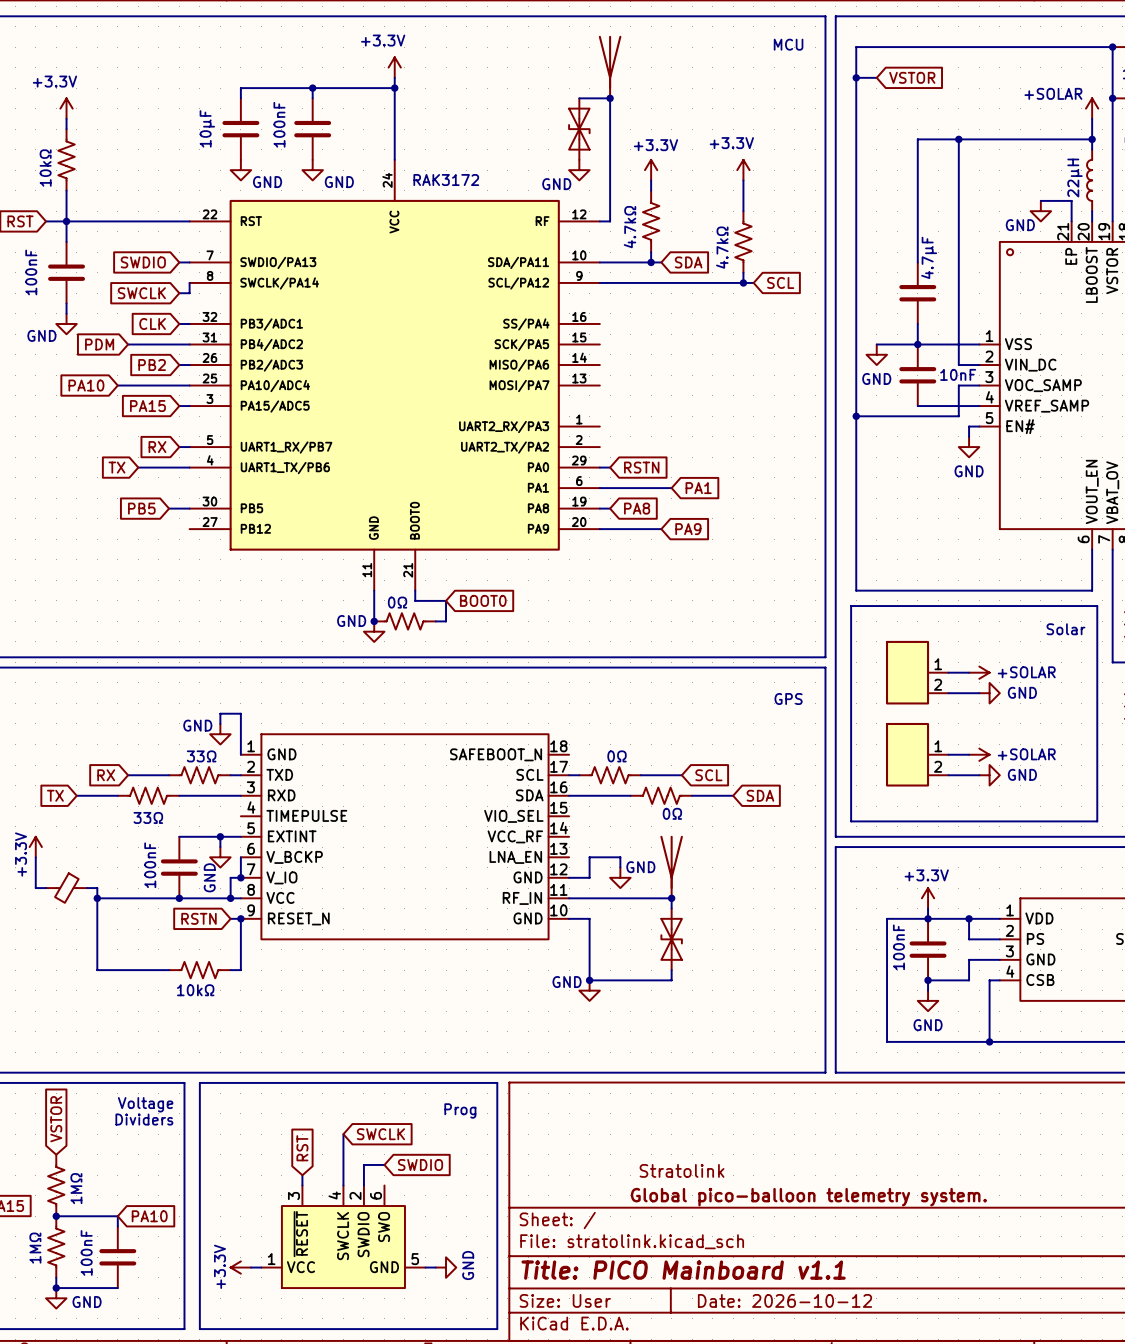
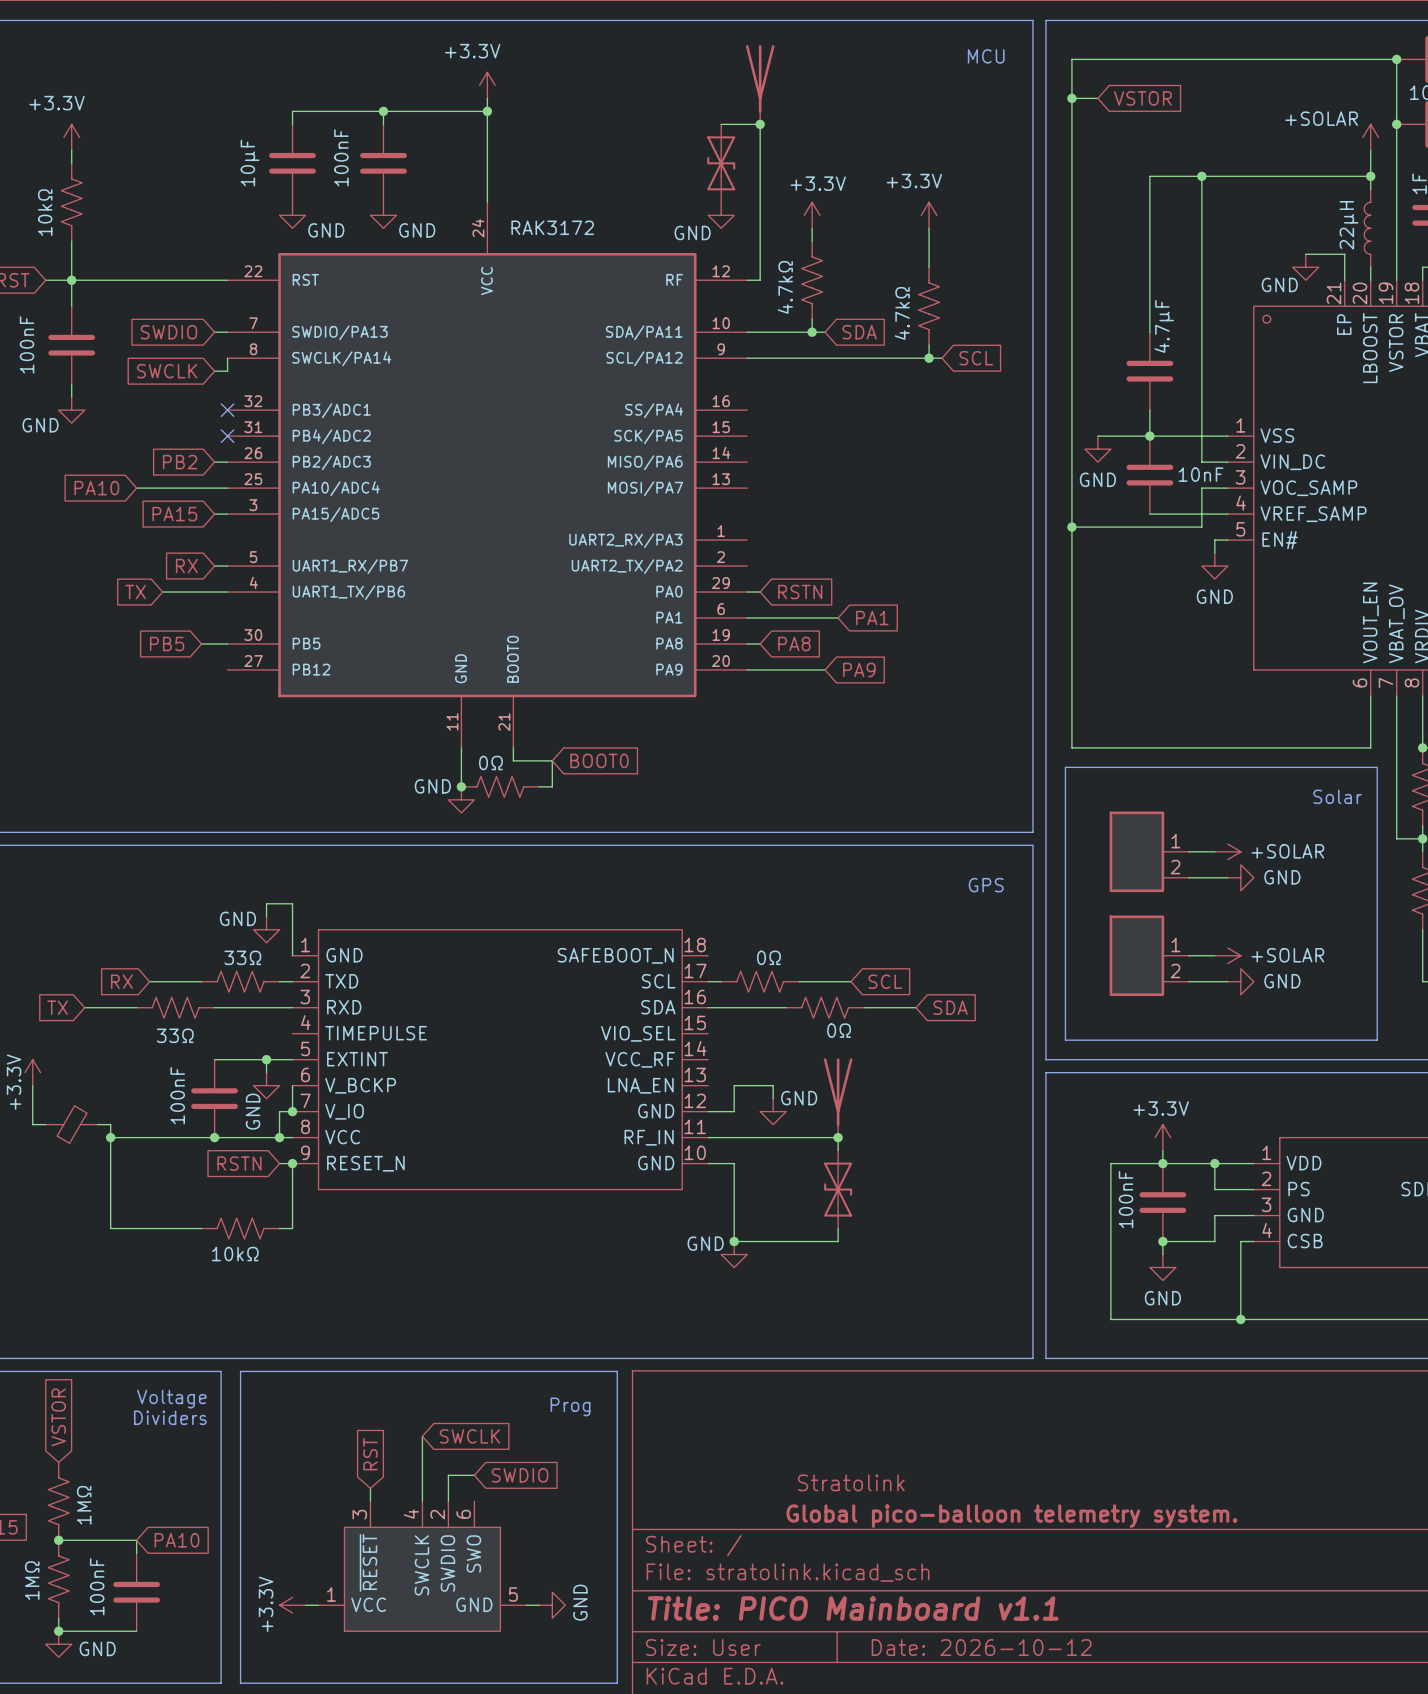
global label: CLK (152, 323) -> none
wire: (179, 323) (189, 323) -> none
no-connect mark: none -> (227, 410)
global label: PDM (99, 344) -> none
wire: (128, 344) (189, 344) -> none
no-connect mark: none -> (227, 436)

